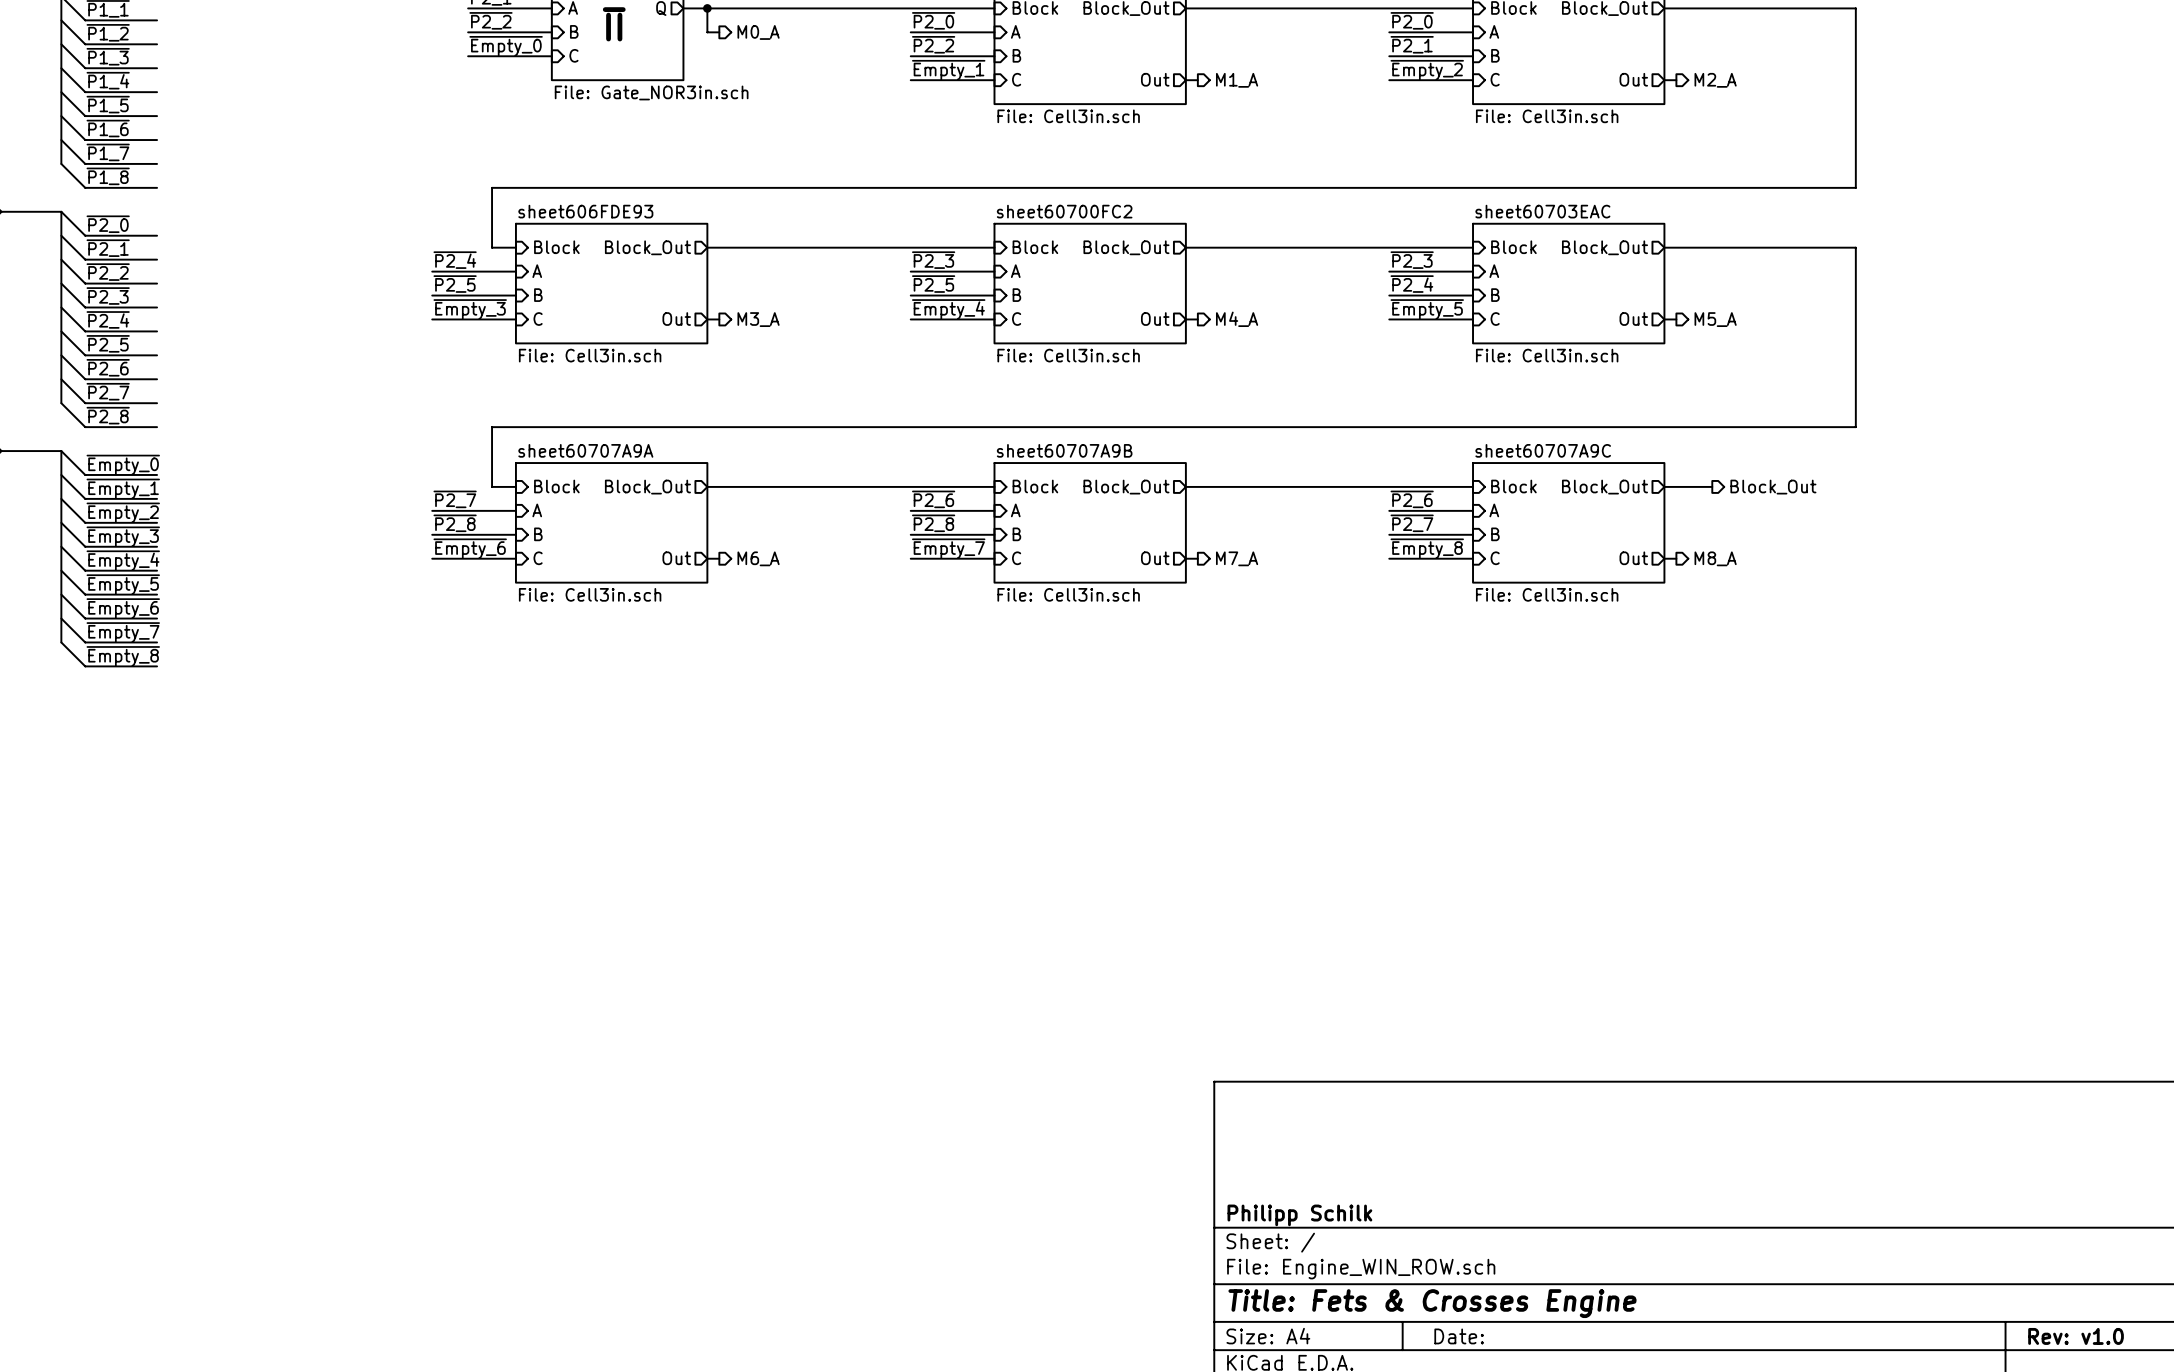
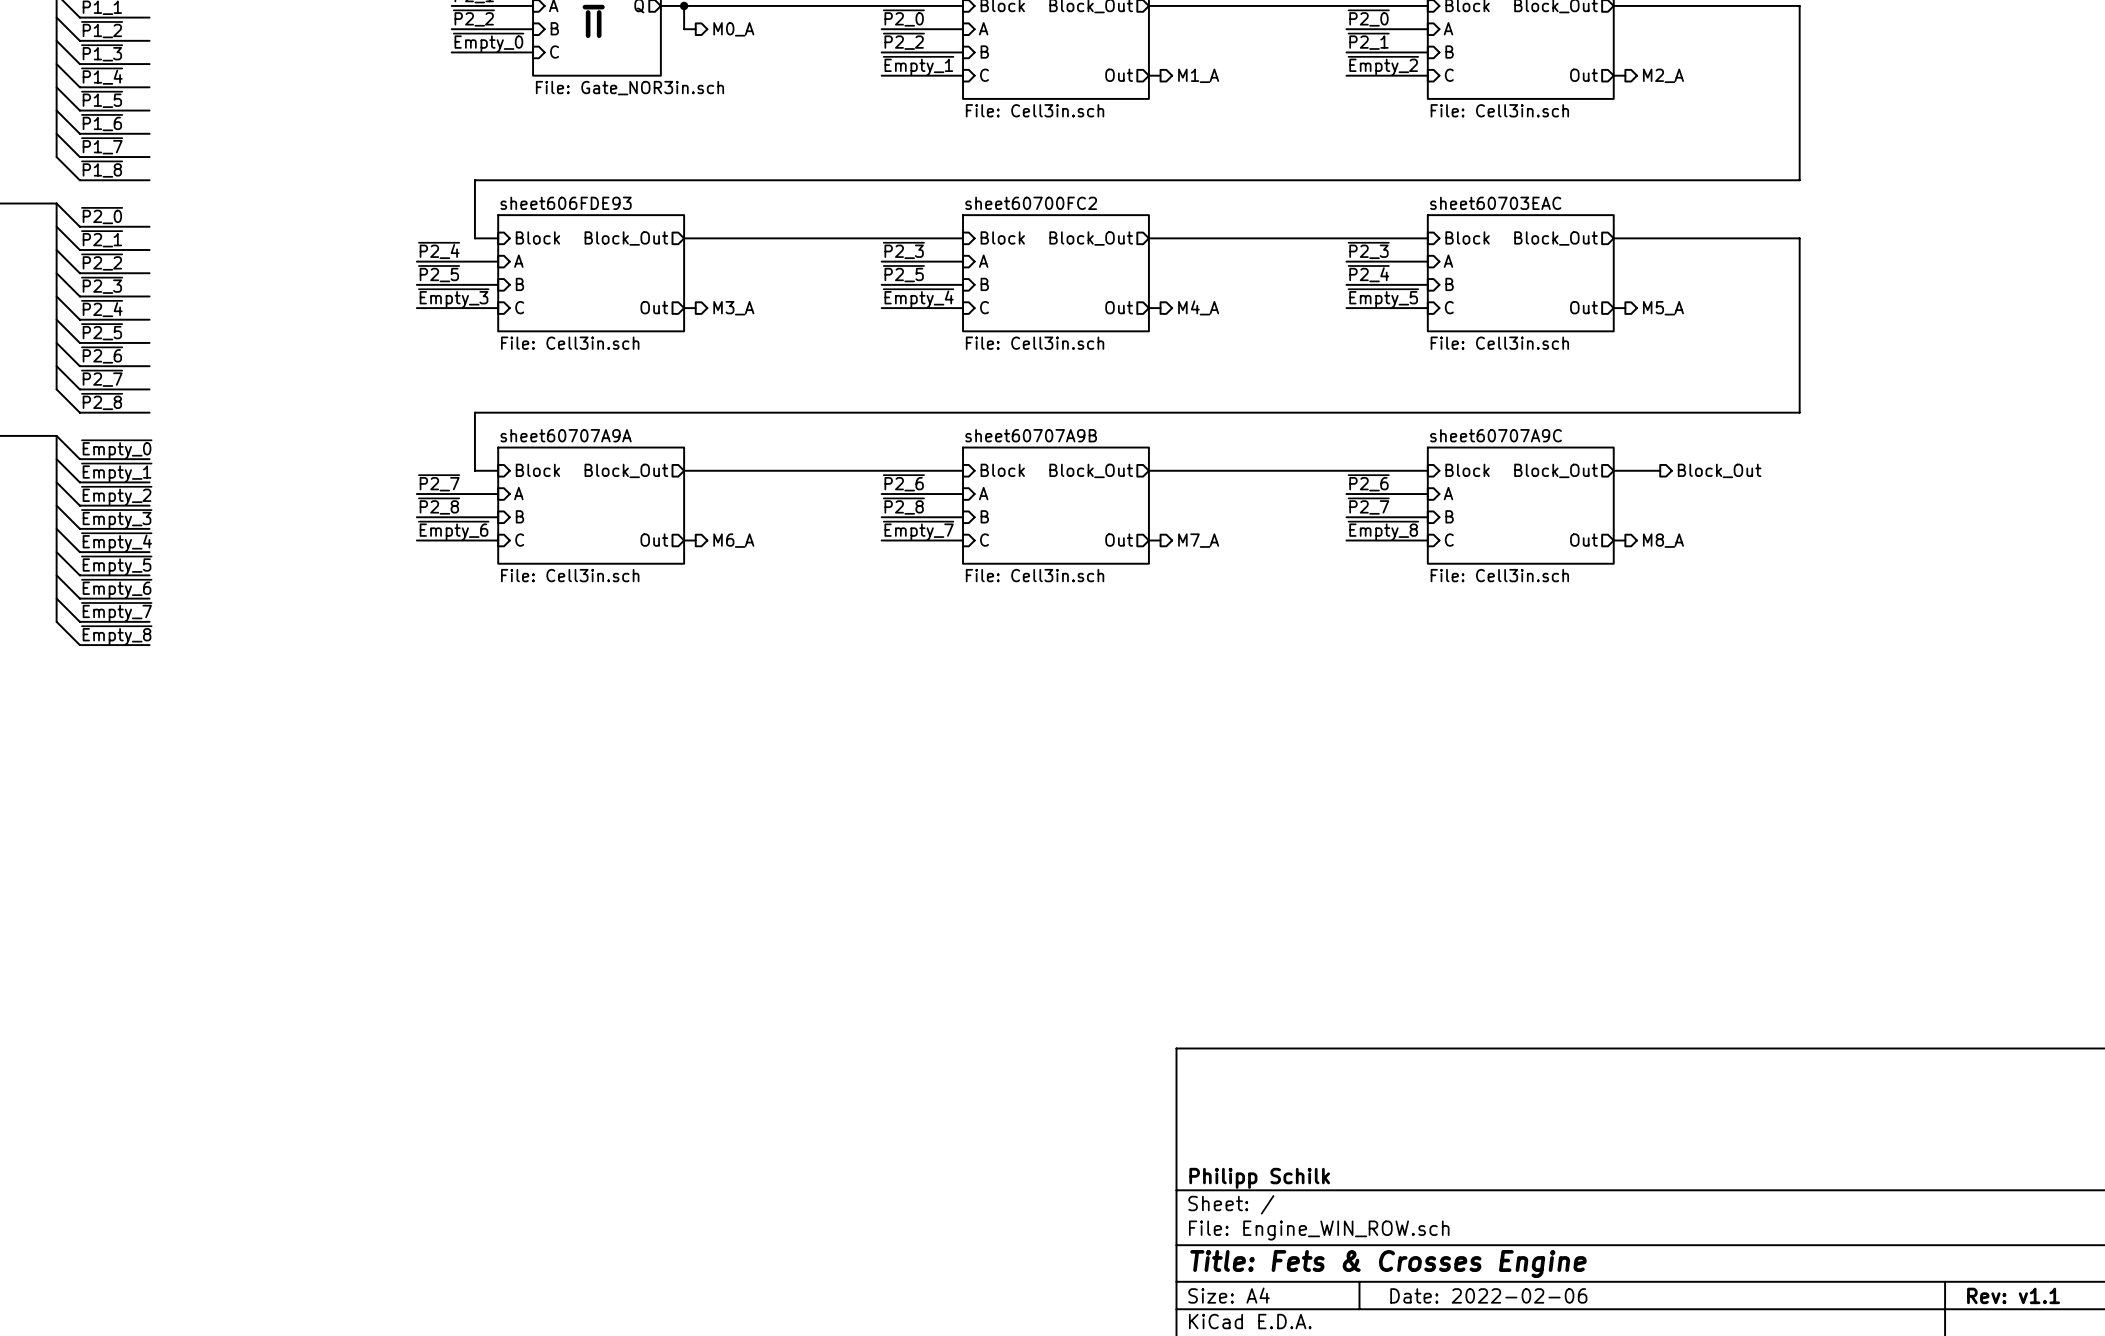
title block: Date: (1459, 1336) -> Date: 2022-02-06 (1488, 1295)
title block: Rev: v1.0 (2076, 1336) -> Rev: v1.1 (2013, 1295)

